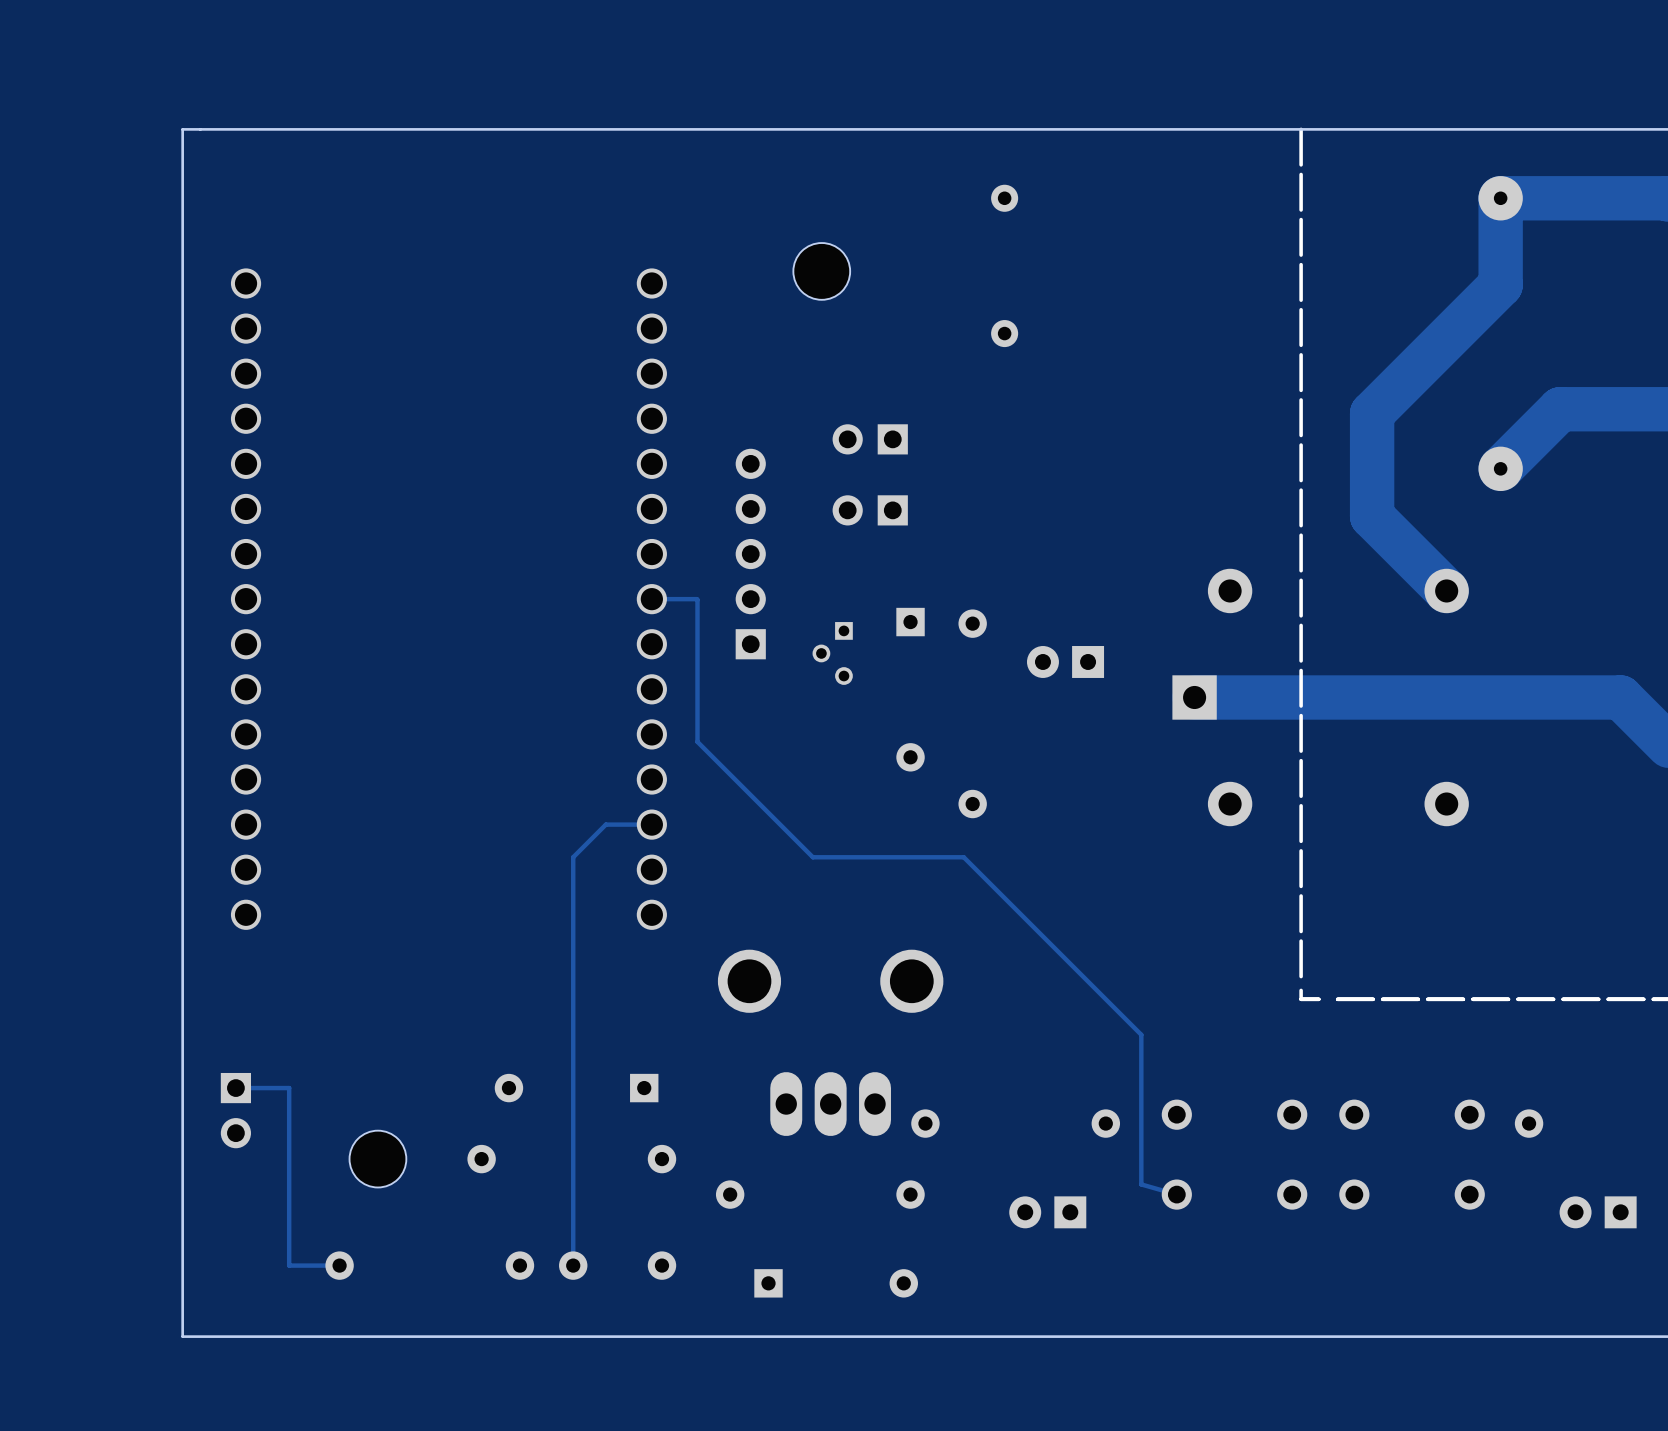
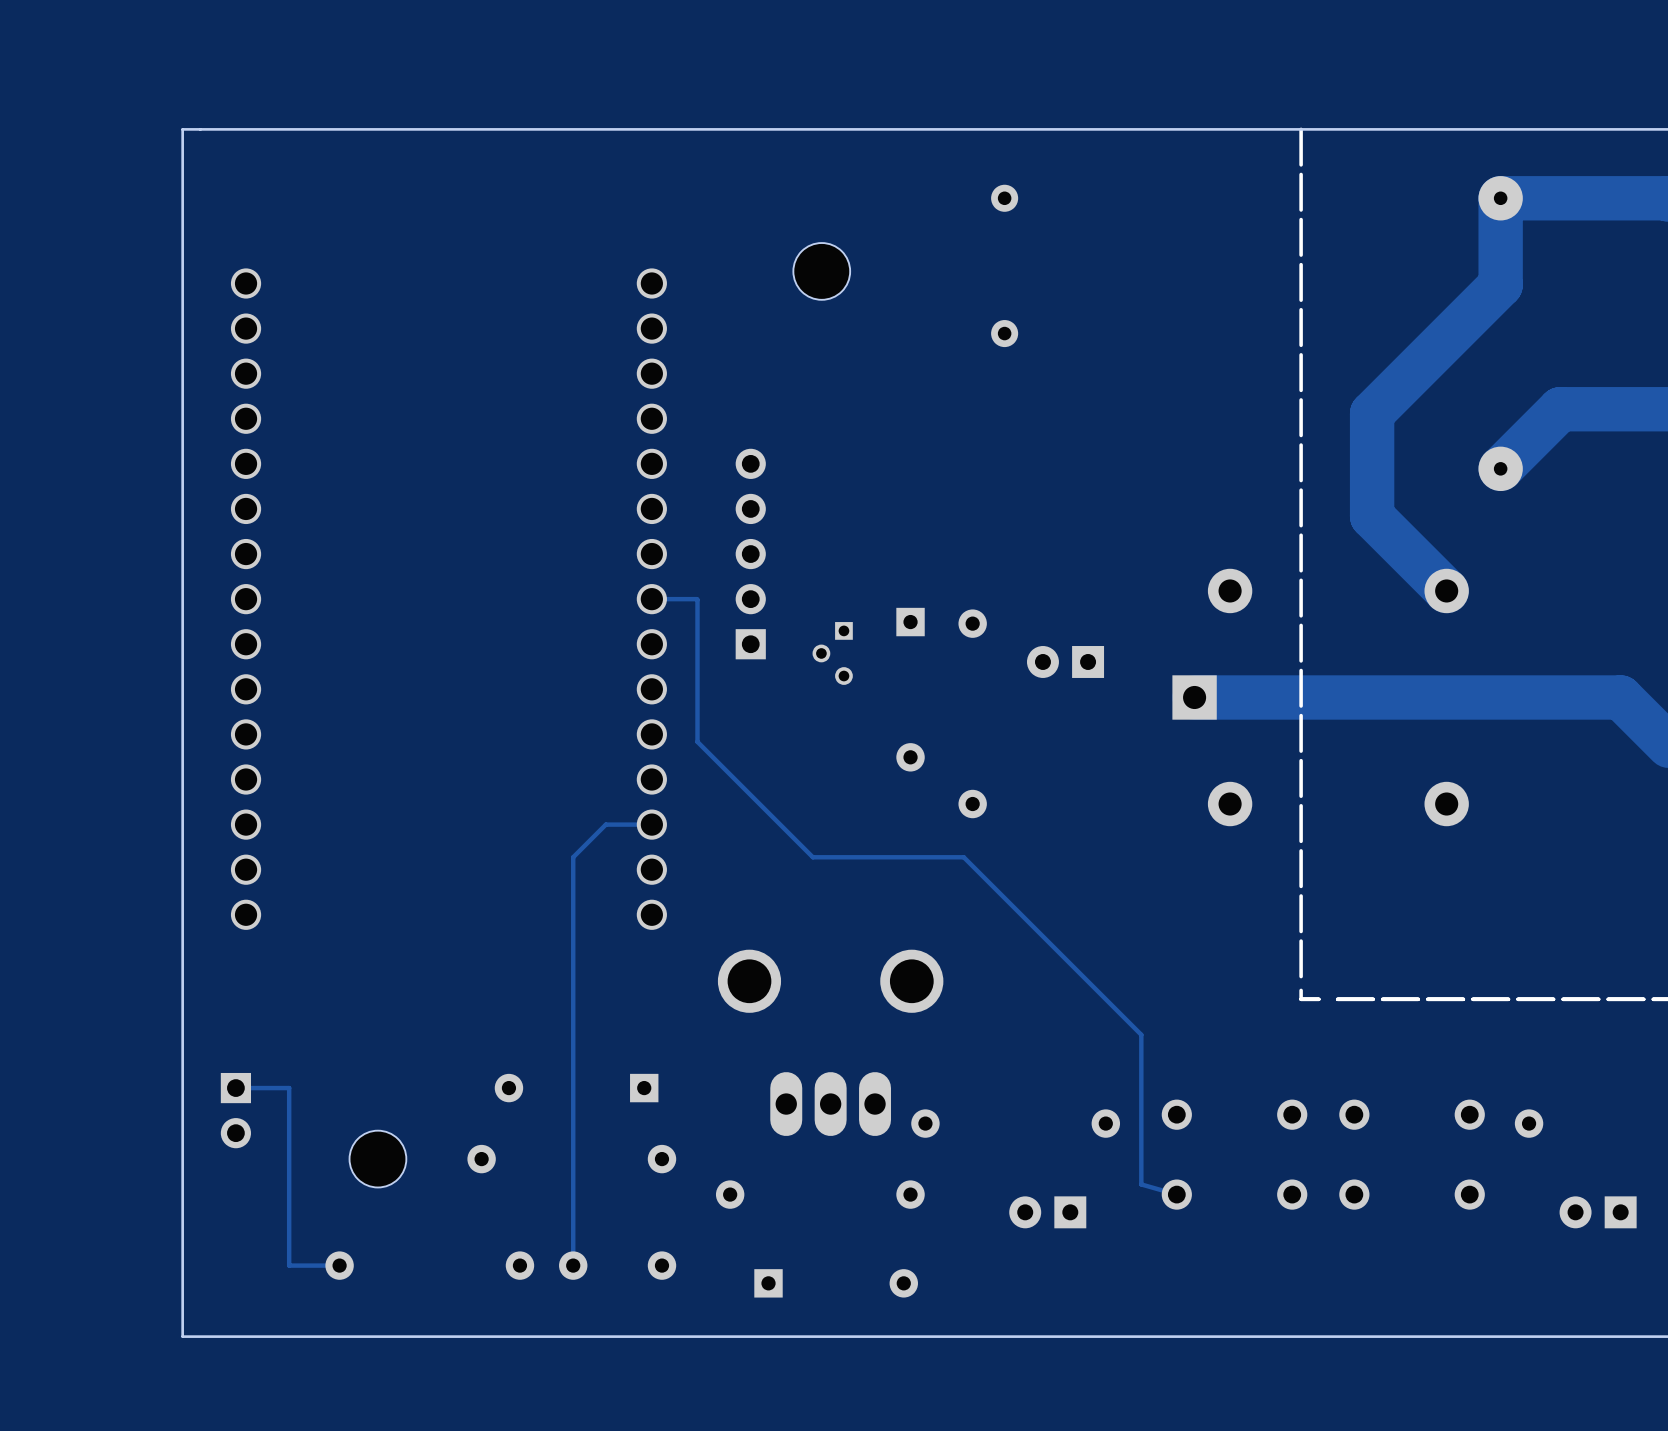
part: (870, 439) -> none
part: (870, 510) -> none

